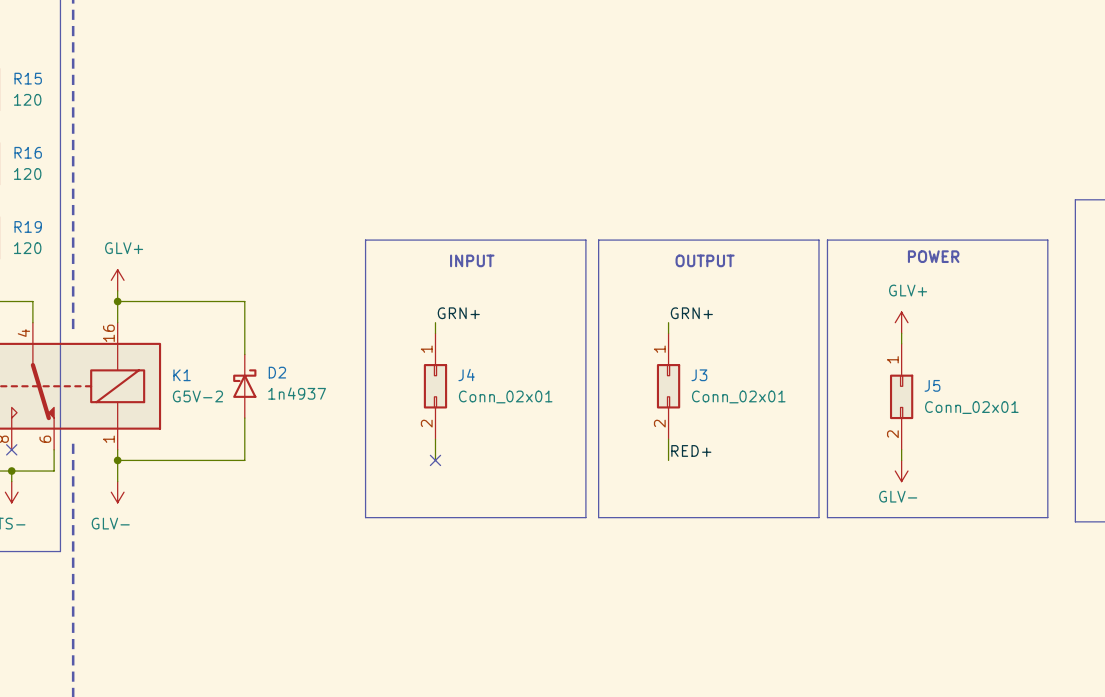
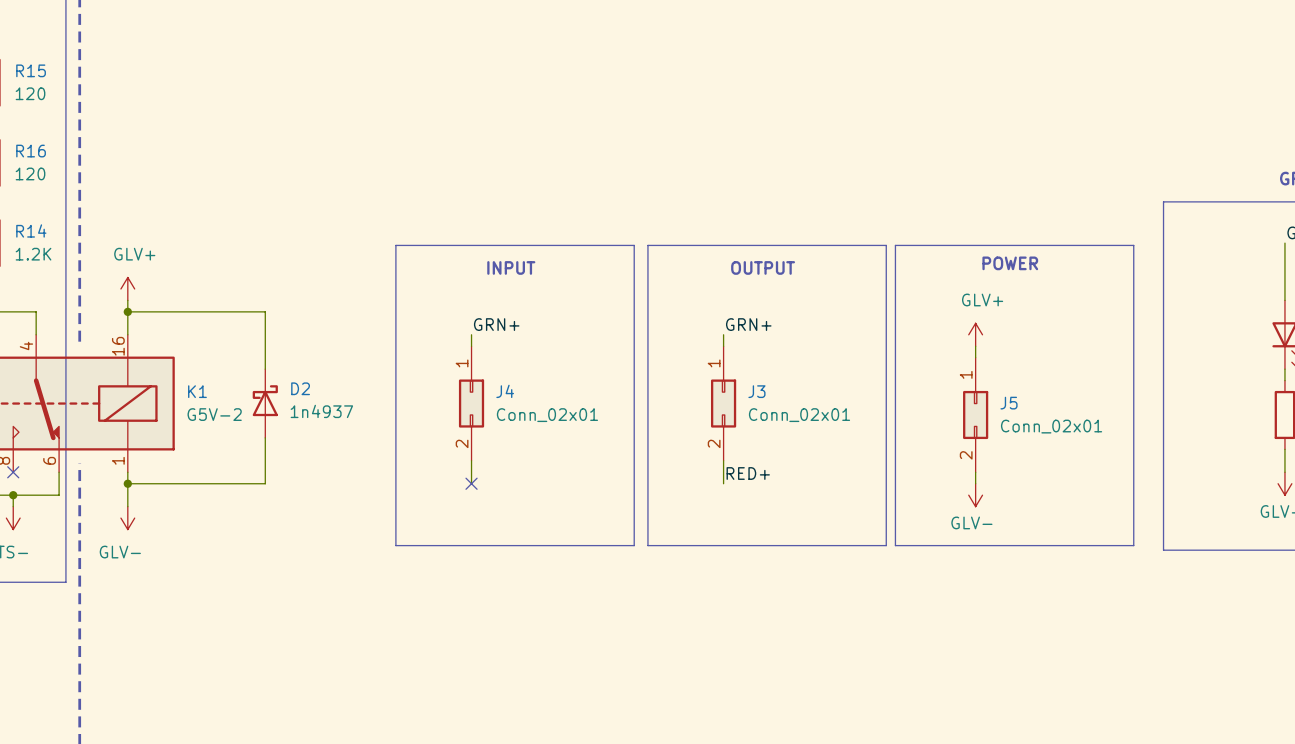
R19 name: R19 (28, 226) -> R14 (31, 230)
R19 value: 120 (27, 248) -> 1.2K (33, 254)

